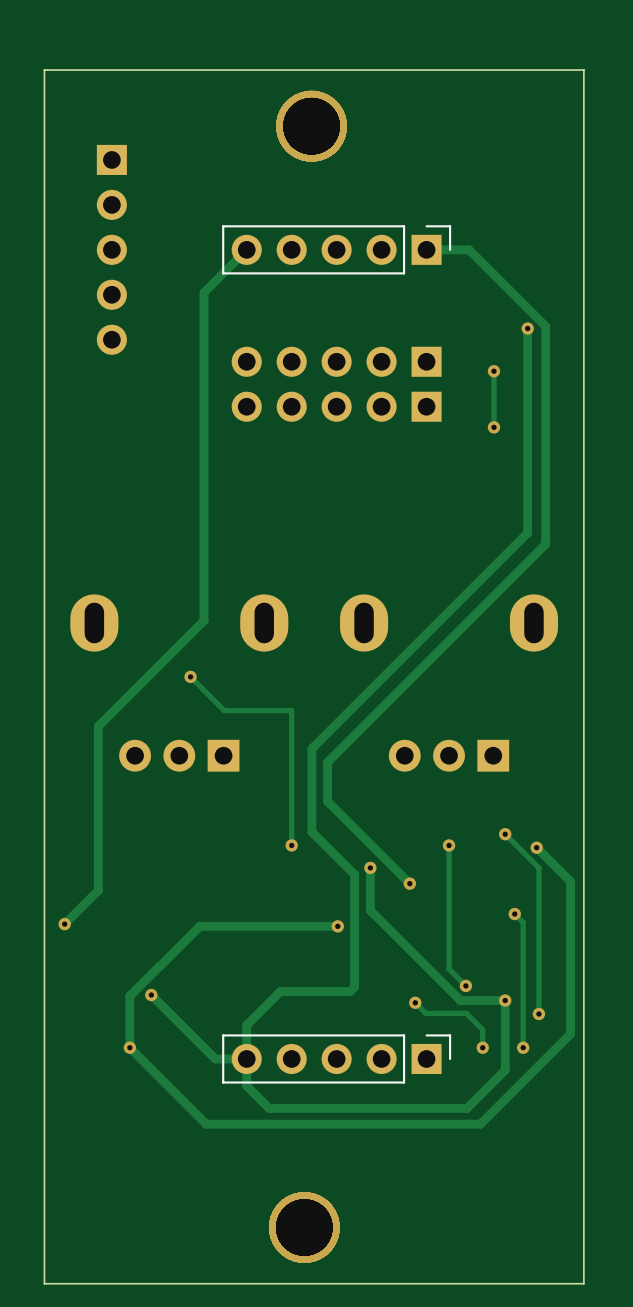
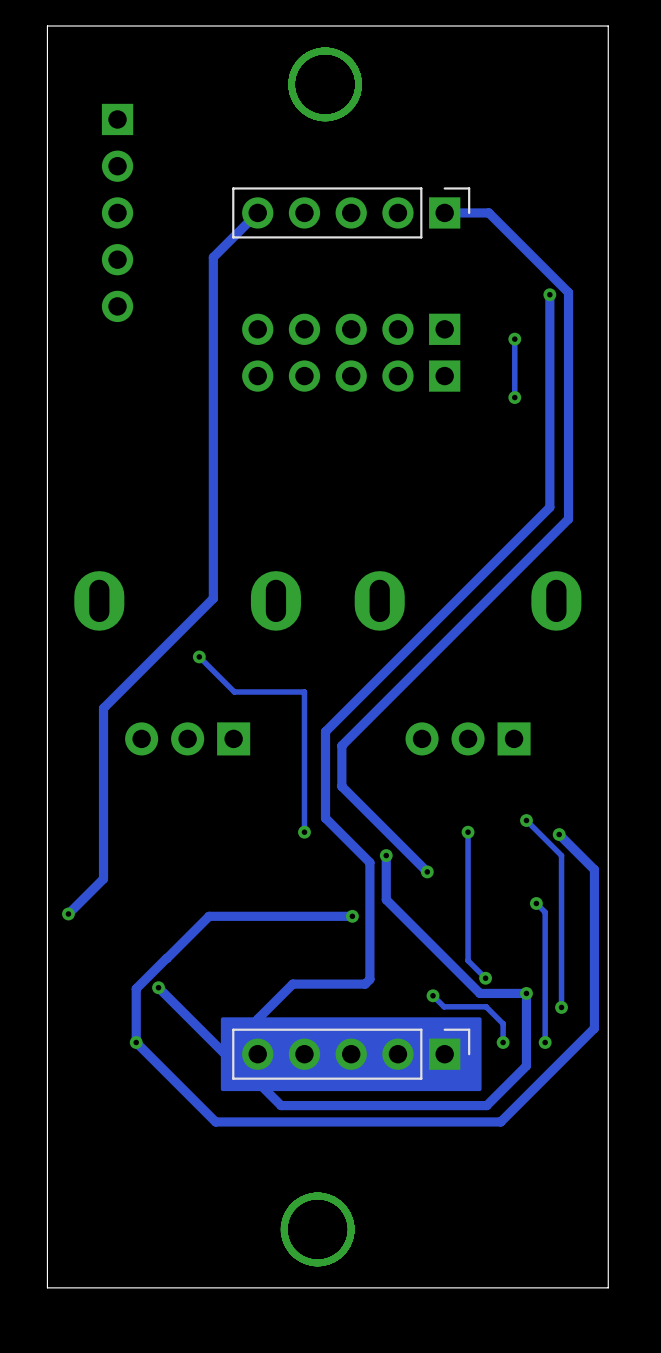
drawing: none -> [220, 1017, 482, 1092]

